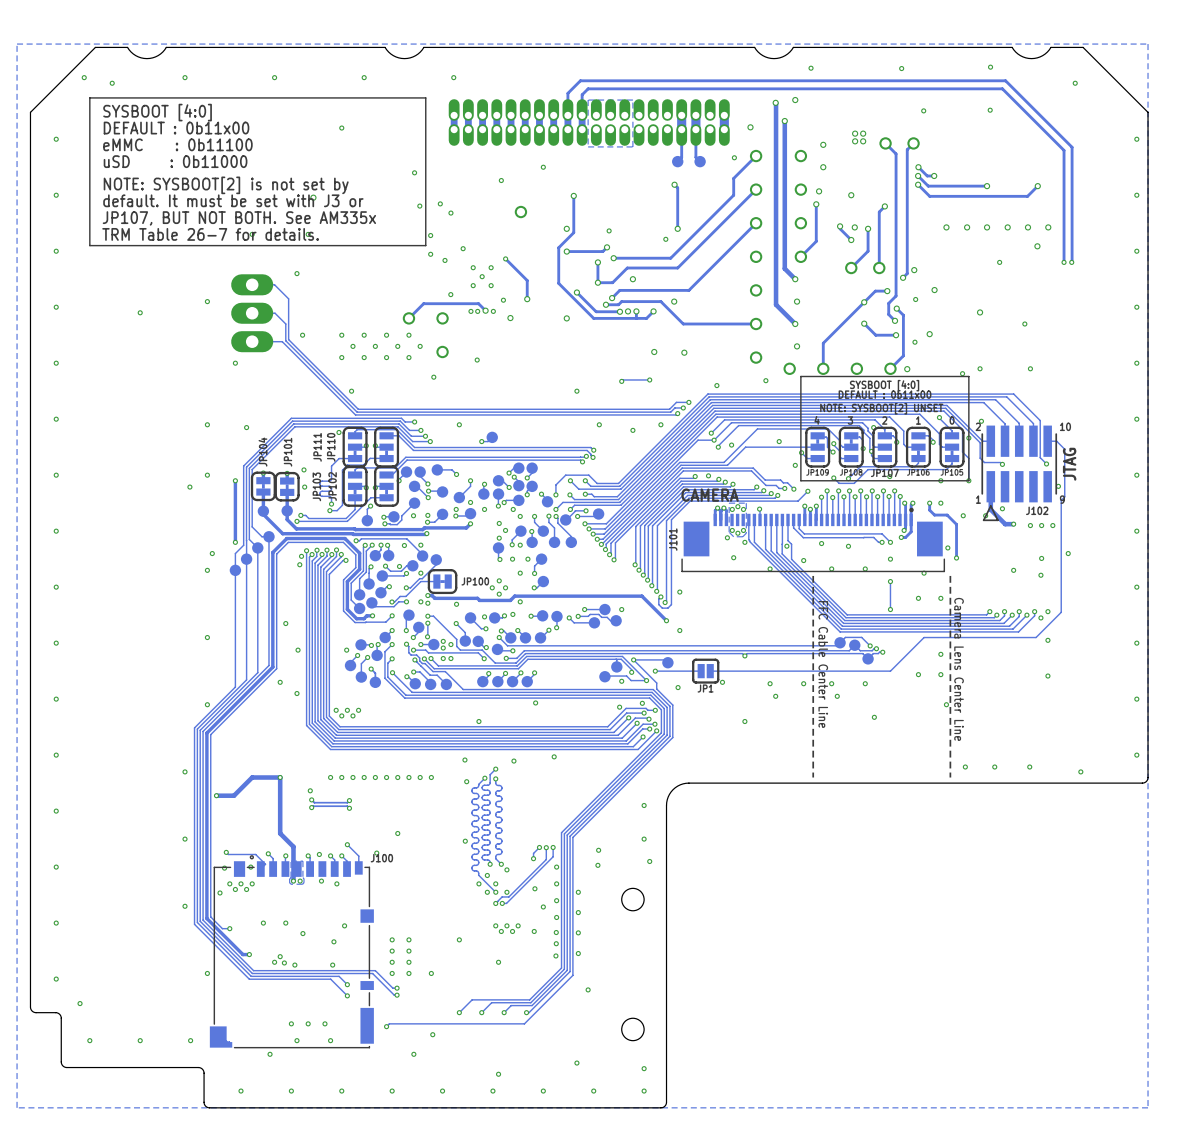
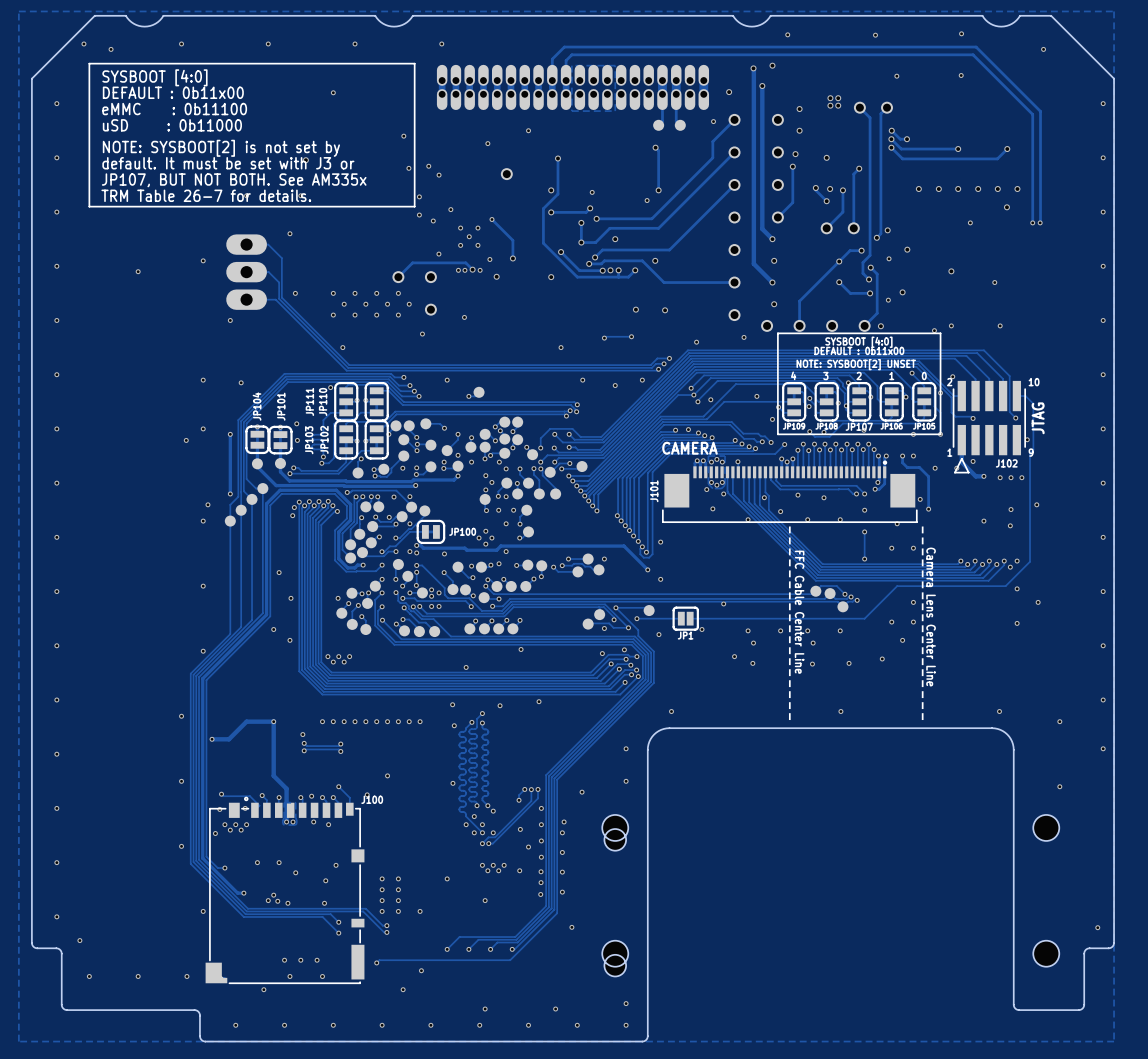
drawing: [30, 47, 1149, 1108] -> none
part: none -> (572, 528)
via: none -> (1038, 602)
via: none -> (902, 640)
via: (946, 704) -> none
via: none -> (734, 656)
via: none -> (882, 658)
via: none -> (752, 663)
via: none -> (812, 664)
via: (744, 721) -> none
via: none -> (671, 711)
via: none -> (840, 711)
via: (965, 767) -> none
via: (994, 767) -> none
via position: (1080, 771) -> (1059, 721)
via: none -> (1103, 748)
via: none -> (1059, 786)
via: (649, 861) -> none
via position: (597, 865) -> (564, 821)
via: none -> (1097, 927)
via position: (576, 1063) -> (555, 1009)

